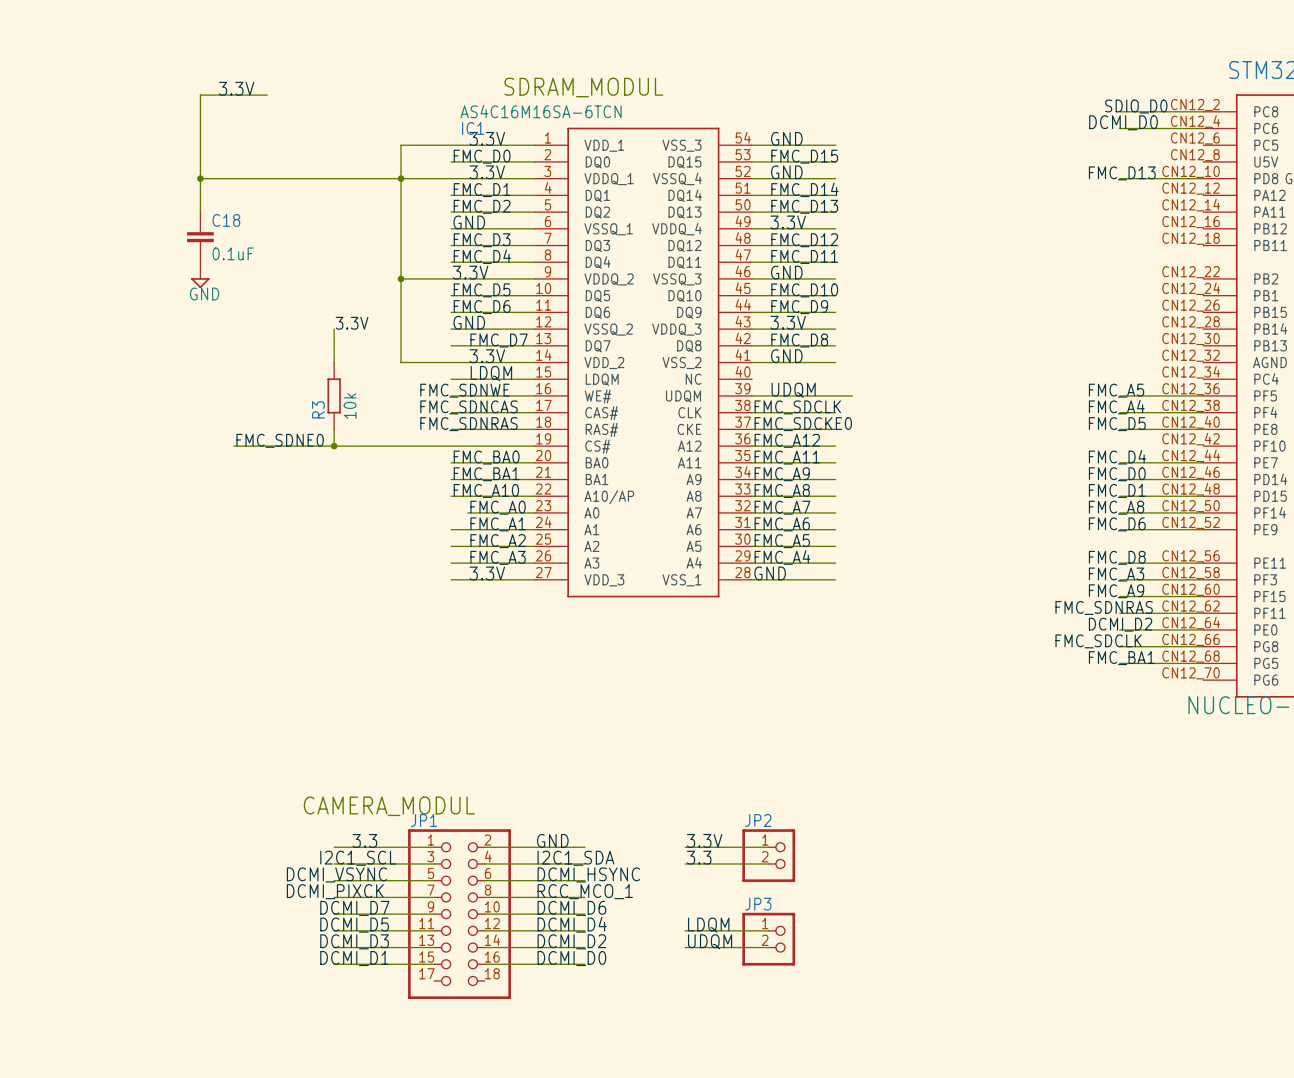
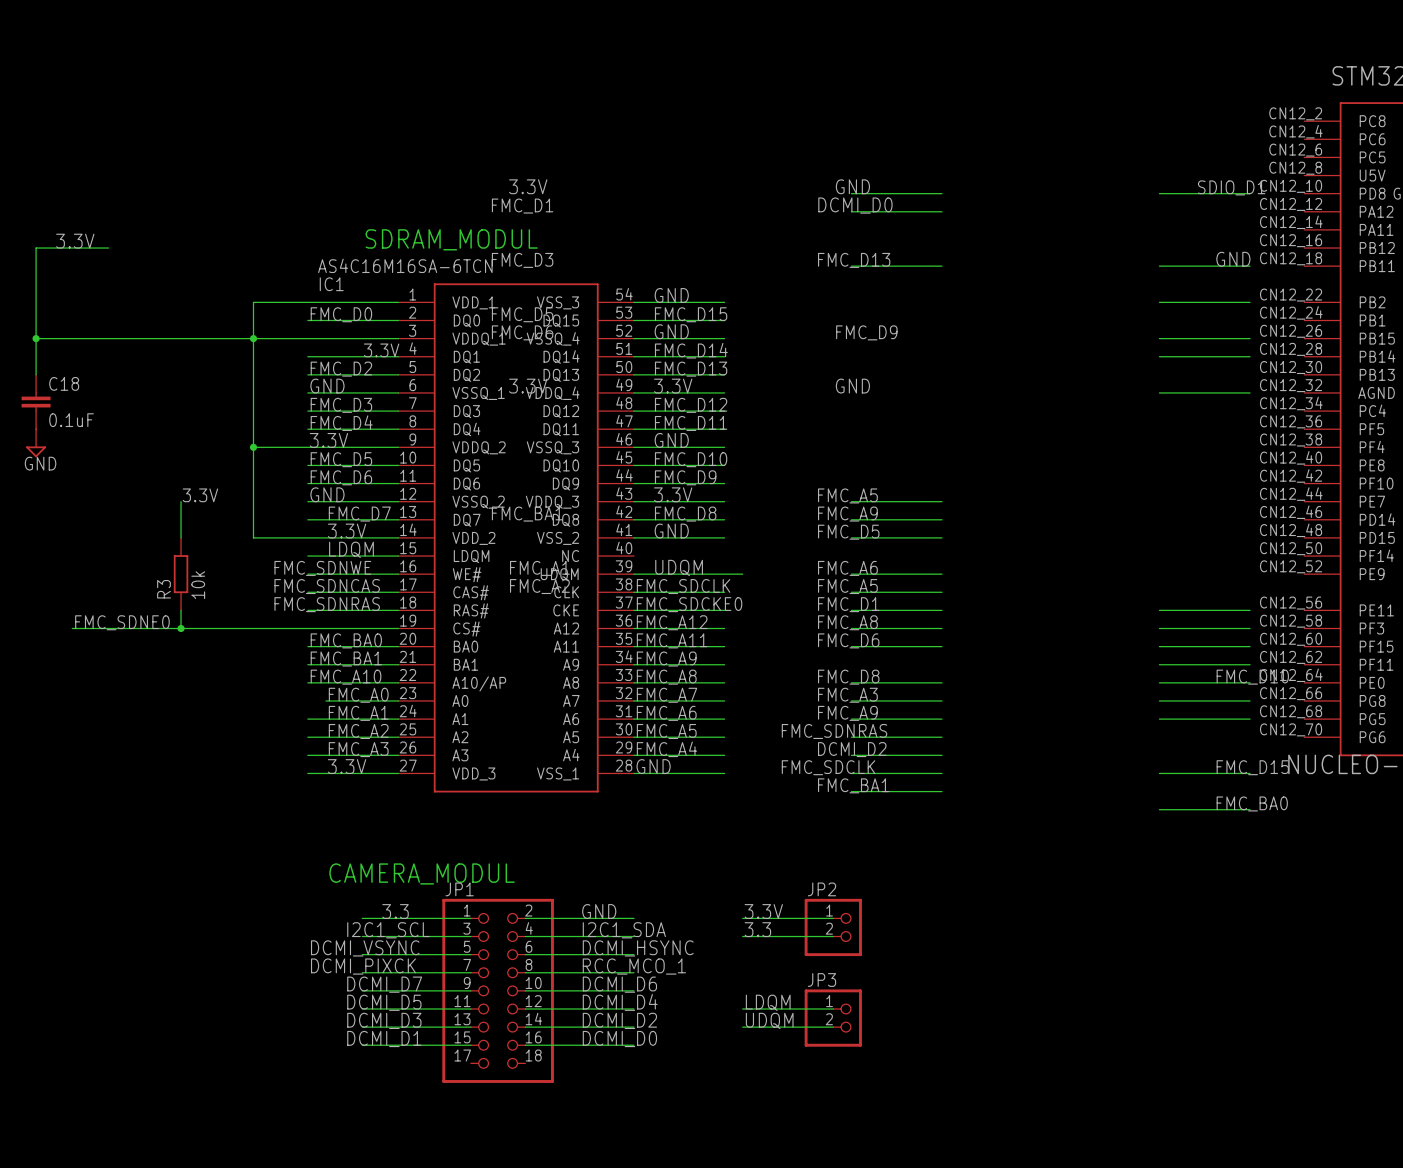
text: SDRAM_MODUL (583, 87) -> none
label: 3.3V (236, 88) -> none
wire: (267, 95) (200, 95) (200, 212) -> none
label: SDIO_D0 (1136, 106) -> none
wire: (1119, 111) (1203, 111) -> none
label: DCMI_D0 (1123, 122) -> none
wire: (1119, 128) (1203, 128) -> none
label: 3.3V (487, 138) -> none
label: GND (786, 138) -> none
wire: (534, 145) (401, 145) (401, 362) (534, 362) -> none
wire: (752, 145) (835, 145) -> none
label: FMC_D0 (482, 156) -> none
label: FMC_D15 (804, 156) -> none
wire: (451, 161) (534, 161) -> none
wire: (752, 161) (835, 161) -> none
label: FMC_D13 (1122, 173) -> none
label: none -> SDIO_D1 (1231, 187)
wire: (200, 178) (534, 178) -> none
junction: (200, 178) -> none
junction: (401, 178) -> none
wire: (752, 178) (785, 178) -> (905, 193) (942, 193)
wire: (1153, 178) (1203, 178) -> (1159, 193) (1213, 193)
label: none -> DCMI_D0 (855, 205)
label: FMC_D14 (804, 189) -> none
wire: (451, 195) (534, 195) -> (633, 302) (724, 302)
wire: (752, 195) (785, 195) -> (905, 211) (942, 211)
label: FMC_D2 (482, 206) -> none
label position: FMC_D13 (804, 206) -> FMC_D13 (854, 260)
wire: (451, 212) (534, 212) -> (633, 320) (724, 320)
wire: (752, 212) (835, 212) -> none
text: none -> SDRAM_MODUL (451, 239)
label: none -> 3.3V (75, 241)
label: GND (469, 222) -> none
label: 3.3V (788, 222) -> none
wire: none -> (108, 248) (36, 248) (36, 374)
wire: (451, 228) (534, 228) -> (633, 338) (724, 338)
wire: (752, 228) (835, 228) -> none
C18 position: (200, 237) -> (36, 402)
label: none -> GND (1233, 259)
label: FMC_D12 (804, 240) -> none
wire: (451, 245) (534, 245) -> (633, 356) (724, 356)
wire: (752, 245) (785, 245) -> (905, 266) (942, 266)
label: FMC_D4 (482, 256) -> none
label: FMC_D11 (804, 256) -> none
wire: (752, 262) (835, 262) -> none
label: 3.3V (470, 272) -> none
label: none -> GND (671, 295)
label: GND (786, 272) -> none
power symbol: GND (200, 275) -> none
wire: none -> (398, 302) (253, 302) (253, 537) (398, 537)
wire: (401, 278) (534, 278) -> none
junction: (401, 278) -> none
wire: (752, 278) (835, 278) -> none
label: none -> FMC_D0 (341, 314)
label: none -> FMC_D15 (691, 314)
label: FMC_D10 (804, 290) -> none
wire: none -> (307, 320) (398, 320)
wire: (451, 295) (534, 295) -> (633, 411) (724, 411)
wire: (752, 295) (835, 295) -> none
label: none -> GND (671, 331)
wire: none -> (36, 338) (398, 338)
junction: none -> (36, 338)
junction: none -> (253, 338)
wire: (451, 312) (534, 312) -> (633, 429) (724, 429)
wire: (752, 312) (835, 312) -> none
label: GND (469, 322) -> none
label: 3.3V (788, 322) -> none
label: none -> FMC_D14 (691, 350)
wire: none -> (307, 356) (398, 356)
wire: (334, 329) (334, 362) -> none
wire: (451, 329) (534, 329) -> (633, 447) (724, 447)
wire: (752, 329) (835, 329) -> none
label: none -> FMC_D2 (341, 369)
label: FMC_D7 (499, 340) -> none
label: none -> FMC_D13 (691, 369)
label: FMC_D8 (799, 340) -> none
wire: none -> (307, 374) (398, 374)
wire: (451, 345) (534, 345) -> (633, 465) (724, 465)
wire: (752, 345) (835, 345) -> none
label: none -> GND (327, 386)
label: none -> 3.3V (673, 386)
wire: none -> (307, 392) (398, 392)
wire: none -> (633, 392) (724, 392)
IC1 position: (643, 362) -> (516, 537)
wire: (752, 362) (835, 362) -> none
label: none -> FMC_D3 (341, 405)
label: LDQM (491, 373) -> none
label: none -> FMC_D12 (691, 405)
wire: none -> (307, 411) (398, 411)
wire: (451, 379) (534, 379) -> (633, 501) (724, 501)
label: none -> FMC_D4 (341, 423)
label: FMC_SDNWE (464, 390) -> none
label: none -> FMC_D11 (691, 423)
label: UDQM (793, 390) -> none
label: FMC_A5 (1116, 390) -> none
wire: none -> (307, 429) (398, 429)
R3 position: (334, 395) -> (181, 574)
wire: (451, 395) (534, 395) -> (633, 519) (724, 519)
wire: (752, 395) (852, 395) -> none
wire: (1119, 395) (1203, 395) -> (1159, 266) (1250, 266)
label: none -> 3.3V (328, 440)
label: none -> GND (671, 440)
label: FMC_SDNCAS (468, 407) -> none
label: FMC_SDCLK (797, 407) -> none
label: FMC_A4 (1116, 407) -> none
power symbol: none -> GND (36, 443)
wire: none -> (253, 447) (398, 447)
junction: none -> (253, 447)
wire: (451, 412) (534, 412) -> (633, 537) (724, 537)
wire: (752, 412) (835, 412) -> none
wire: (1119, 412) (1203, 412) -> none
label: none -> FMC_D5 (341, 459)
label: FMC_SDNRAS (468, 424) -> none
label: none -> FMC_D10 (691, 459)
label: FMC_SDCKE0 (803, 424) -> none
label: FMC_D5 (1117, 424) -> none
wire: none -> (307, 465) (398, 465)
wire: (334, 429) (334, 446) -> none
wire: (451, 429) (534, 429) -> (633, 483) (724, 483)
wire: (752, 429) (835, 429) -> none
wire: (1119, 429) (1203, 429) -> (1159, 302) (1250, 302)
label: FMC_SDNE0 (280, 440) -> none
label: none -> FMC_D6 (341, 477)
label: none -> FMC_D9 (685, 477)
label: FMC_A12 (787, 440) -> none
wire: (233, 446) (284, 446) -> none
junction: (334, 446) -> none
wire: (367, 446) (534, 446) -> none
wire: (752, 446) (835, 446) -> (851, 646) (942, 646)
label: none -> 3.3V (200, 495)
label: none -> GND (327, 494)
label: none -> 3.3V (673, 494)
label: FMC_BA0 (486, 457) -> none
label: FMC_A11 (787, 457) -> FMC_A5 (847, 495)
label: FMC_D4 (1117, 457) -> none
wire: none -> (181, 501) (181, 537)
wire: none -> (307, 501) (398, 501)
wire: (451, 462) (534, 462) -> (633, 592) (724, 592)
wire: (752, 462) (785, 462) -> (905, 501) (942, 501)
wire: (1119, 462) (1203, 462) -> (1159, 338) (1250, 338)
label: none -> FMC_D7 (359, 514)
label: none -> FMC_D8 (685, 514)
label: FMC_D0 (1117, 474) -> none
wire: none -> (307, 519) (398, 519)
wire: (451, 479) (534, 479) -> (633, 610) (724, 610)
wire: (752, 479) (785, 479) -> (905, 519) (942, 519)
wire: (1119, 479) (1203, 479) -> (1159, 356) (1250, 356)
label: none -> 3.3V (347, 531)
label: none -> GND (671, 531)
label: FMC_A10 (486, 490) -> none
label: FMC_A8 (782, 490) -> FMC_D5 (848, 532)
label: FMC_D1 (1117, 490) -> none
wire: (451, 496) (534, 496) -> (633, 628) (724, 628)
wire: (752, 496) (785, 496) -> (905, 537) (942, 537)
wire: (1119, 496) (1203, 496) -> none
label: none -> LDQM (351, 549)
label: FMC_A0 (498, 507) -> none
label: FMC_A7 (782, 507) -> none
label: FMC_A8 (1116, 507) -> none
wire: none -> (307, 556) (398, 556)
wire: (467, 512) (534, 512) -> none
wire: (752, 512) (835, 512) -> (851, 719) (942, 719)
wire: (1119, 512) (1203, 512) -> (1159, 392) (1250, 392)
label: none -> UDQM (679, 567)
label: none -> FMC_SDNWE (322, 568)
label: FMC_D6 (1117, 524) -> none
wire: none -> (307, 574) (398, 574)
wire: (451, 529) (534, 529) -> (633, 664) (724, 664)
wire: none -> (633, 574) (742, 574)
wire: (752, 529) (785, 529) -> (905, 574) (942, 574)
wire: (1119, 529) (1203, 529) -> none
label: none -> FMC_SDNCAS (327, 586)
label: none -> FMC_SDCLK (683, 586)
wire: none -> (307, 592) (398, 592)
wire: (451, 546) (534, 546) -> (633, 682) (724, 682)
wire: (752, 546) (785, 546) -> (905, 592) (942, 592)
label: none -> FMC_SDNRAS (327, 604)
label: FMC_A3 (498, 557) -> none
label: none -> FMC_SDCKE0 (689, 604)
label: FMC_A4 (782, 557) -> FMC_D1 (848, 604)
label: FMC_D8 (1117, 557) -> none
wire: none -> (181, 610) (181, 628)
wire: none -> (307, 610) (398, 610)
wire: (451, 563) (534, 563) -> (633, 700) (724, 700)
wire: (752, 563) (785, 563) -> (905, 610) (942, 610)
wire: (1153, 563) (1203, 563) -> (1159, 610) (1213, 610)
label: 3.3V (487, 573) -> none
label: GND (770, 573) -> FMC_A8 (847, 622)
label: none -> FMC_SDNE0 (122, 622)
label: none -> FMC_A12 (672, 622)
label: FMC_A3 (1116, 574) -> none
wire: none -> (72, 628) (398, 628)
junction: none -> (181, 628)
wire: (451, 579) (534, 579) -> (633, 719) (724, 719)
wire: (752, 579) (785, 579) -> (905, 628) (942, 628)
wire: (1153, 579) (1203, 579) -> (1159, 628) (1213, 628)
label: none -> FMC_BA0 (346, 640)
label: none -> FMC_A11 (672, 640)
label: none -> FMC_D6 (848, 640)
label: FMC_A9 (1116, 591) -> none
wire: none -> (307, 646) (398, 646)
wire: (1153, 596) (1203, 596) -> (1159, 646) (1213, 646)
label: none -> FMC_BA1 (346, 659)
label: none -> FMC_A9 (666, 659)
label: FMC_SDNRAS (1104, 607) -> none
wire: none -> (307, 664) (398, 664)
wire: (1153, 613) (1203, 613) -> (1159, 664) (1213, 664)
label: none -> FMC_A10 (346, 677)
label: none -> FMC_A8 (666, 677)
label: none -> FMC_D8 (848, 677)
label: DCMI_D2 (1120, 624) -> none
wire: none -> (307, 682) (398, 682)
wire: none -> (851, 682) (942, 682)
wire: (1153, 629) (1203, 629) -> (1159, 682) (1213, 682)
label: none -> FMC_A0 (358, 695)
label: none -> FMC_A7 (666, 695)
label: none -> FMC_A3 (847, 695)
label: FMC_SDCLK (1098, 641) -> FMC_D10 (1252, 677)
wire: none -> (325, 700) (398, 700)
wire: none -> (851, 700) (942, 700)
wire: (1153, 646) (1203, 646) -> (1159, 700) (1213, 700)
label: none -> FMC_A1 (358, 713)
label: none -> FMC_A6 (666, 713)
label: none -> FMC_A9 (847, 713)
label: FMC_BA1 (1121, 658) -> none
wire: none -> (307, 719) (398, 719)
wire: (1153, 663) (1203, 663) -> (1159, 719) (1213, 719)
label: none -> FMC_A2 (358, 731)
label: none -> FMC_A5 (666, 731)
label: none -> FMC_SDNRAS (834, 731)
wire: none -> (307, 737) (398, 737)
wire: none -> (633, 737) (724, 737)
wire: none -> (851, 737) (942, 737)
label: none -> FMC_A3 (358, 749)
label: none -> FMC_A4 (666, 749)
label: none -> DCMI_D2 (852, 749)
wire: none -> (307, 755) (398, 755)
wire: none -> (633, 755) (724, 755)
wire: none -> (851, 755) (942, 755)
label: none -> 3.3V (347, 766)
label: none -> GND (653, 766)
label: none -> FMC_SDCLK (828, 767)
label: none -> FMC_D15 (1252, 767)
wire: none -> (307, 773) (398, 773)
wire: none -> (633, 773) (724, 773)
wire: none -> (851, 773) (942, 773)
wire: none -> (1159, 773) (1250, 773)
label: none -> FMC_BA1 (853, 785)
wire: none -> (851, 791) (942, 791)
label: none -> FMC_BA0 (1252, 803)
wire: none -> (1159, 809) (1250, 809)

